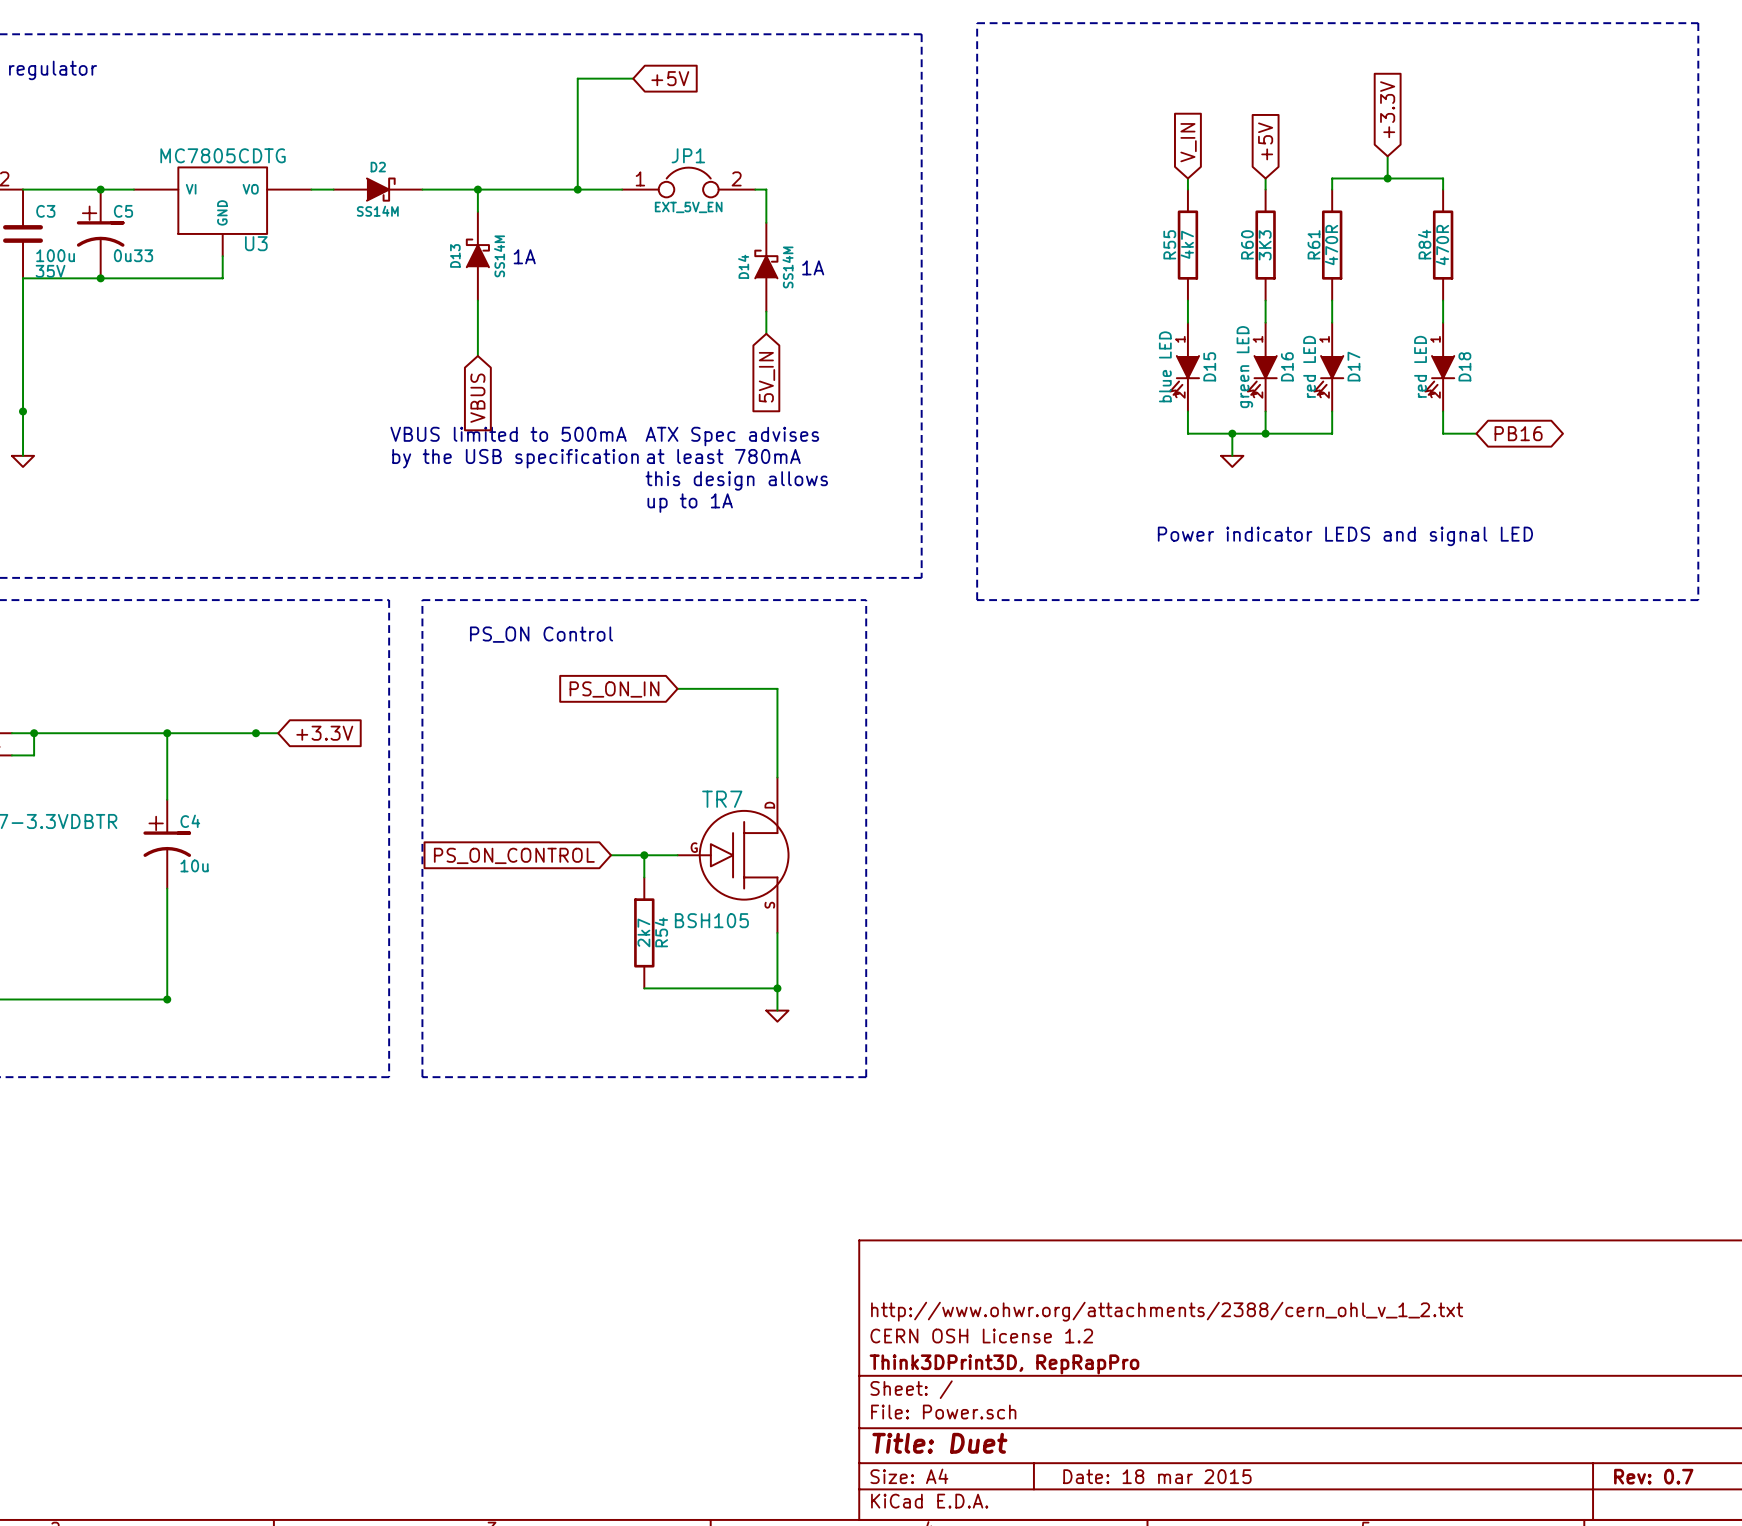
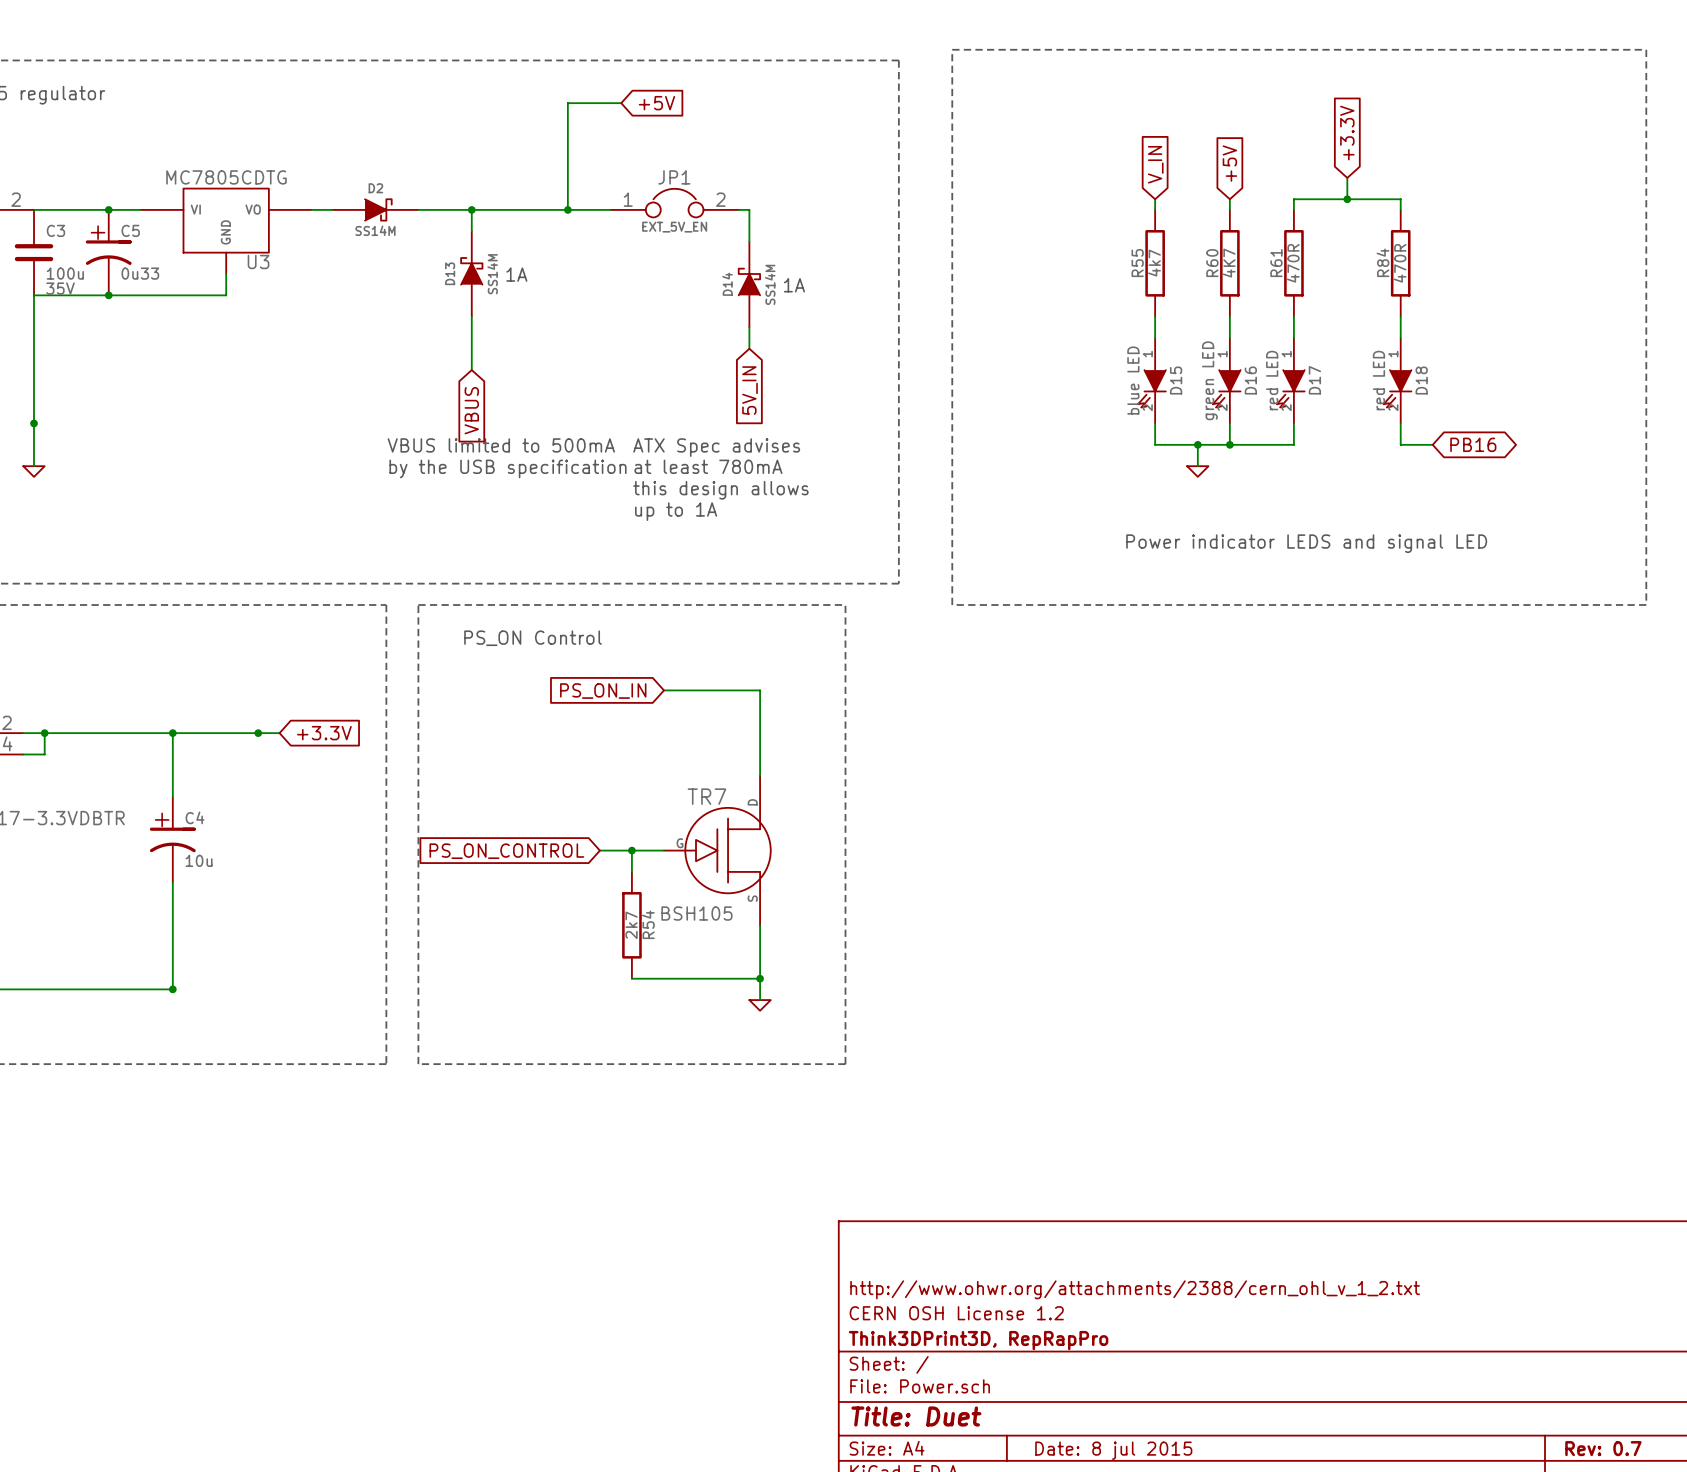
R60 value: 3K3 (1265, 245) -> 4K7 (1229, 263)
title block: Date: 18 mar 2015 (1157, 1476) -> Date: 8 jul 2015 (1113, 1450)

